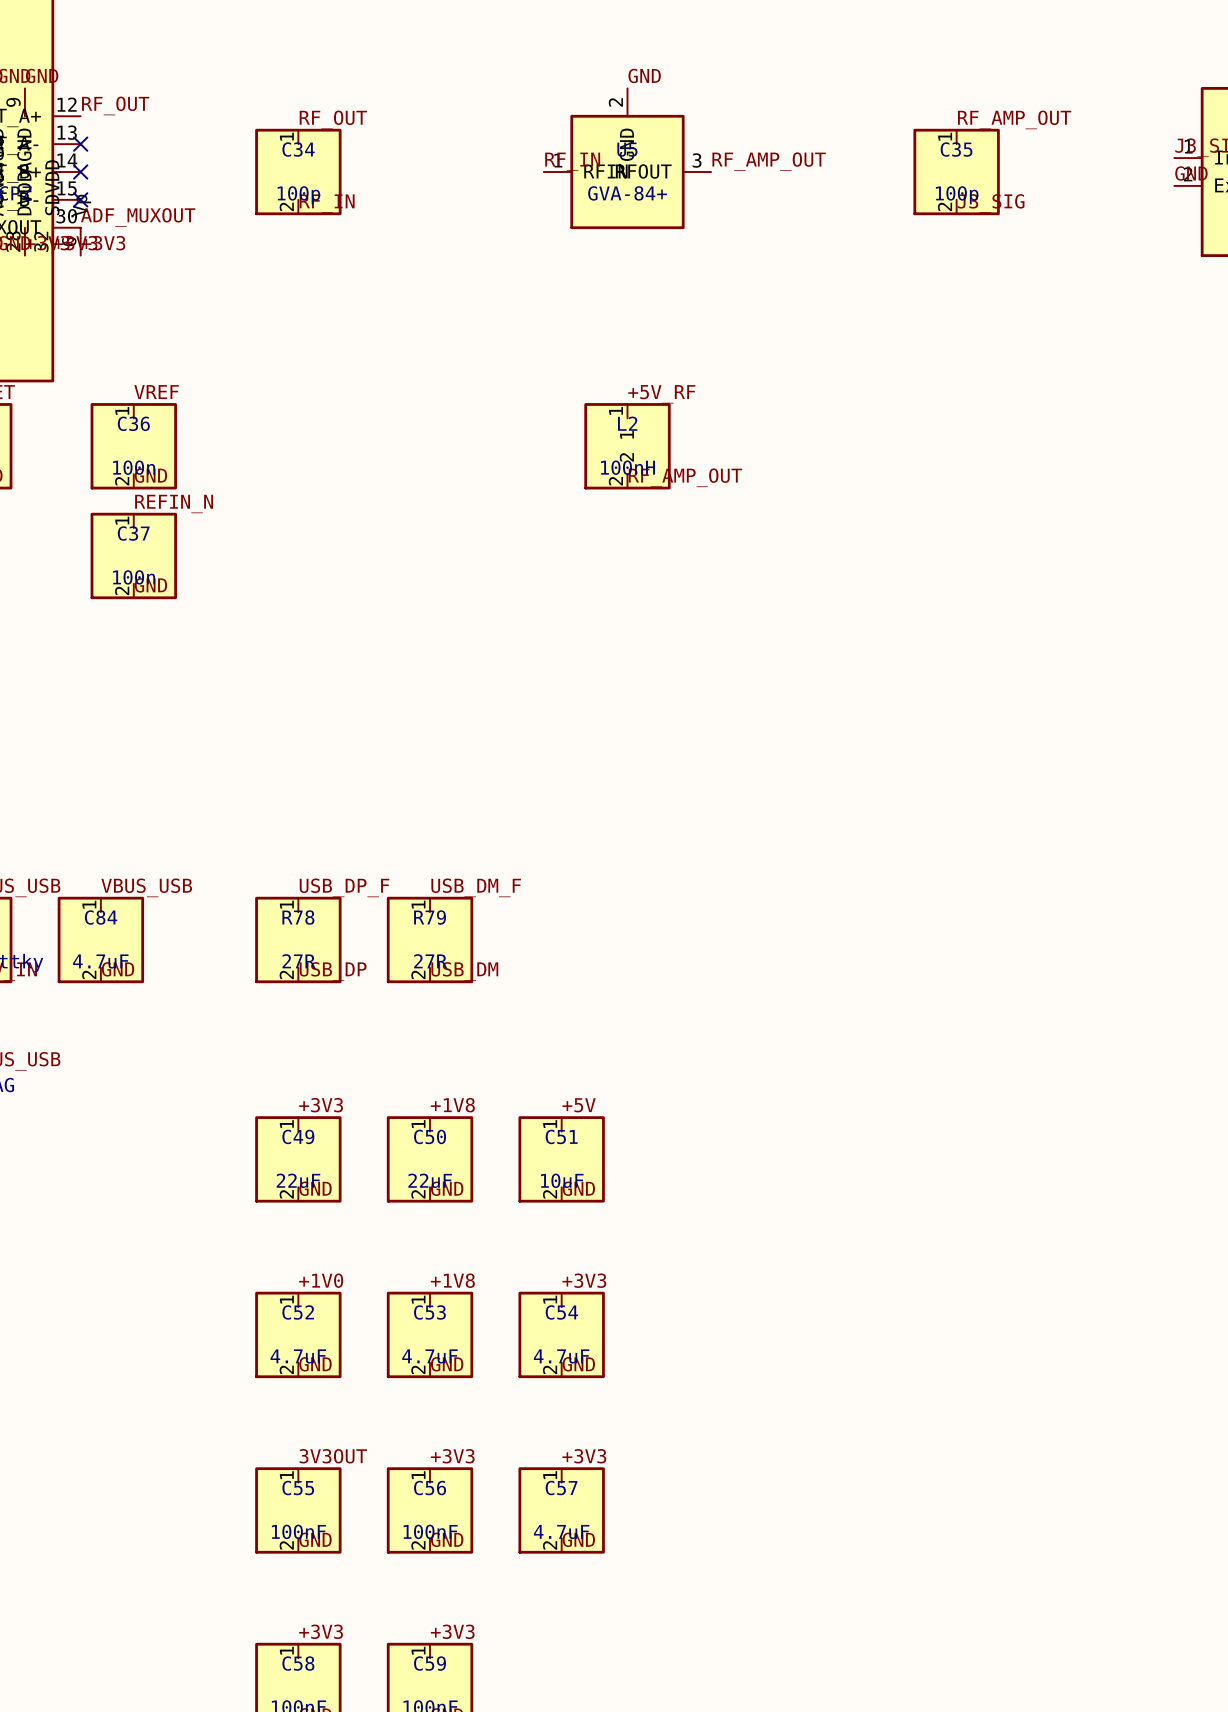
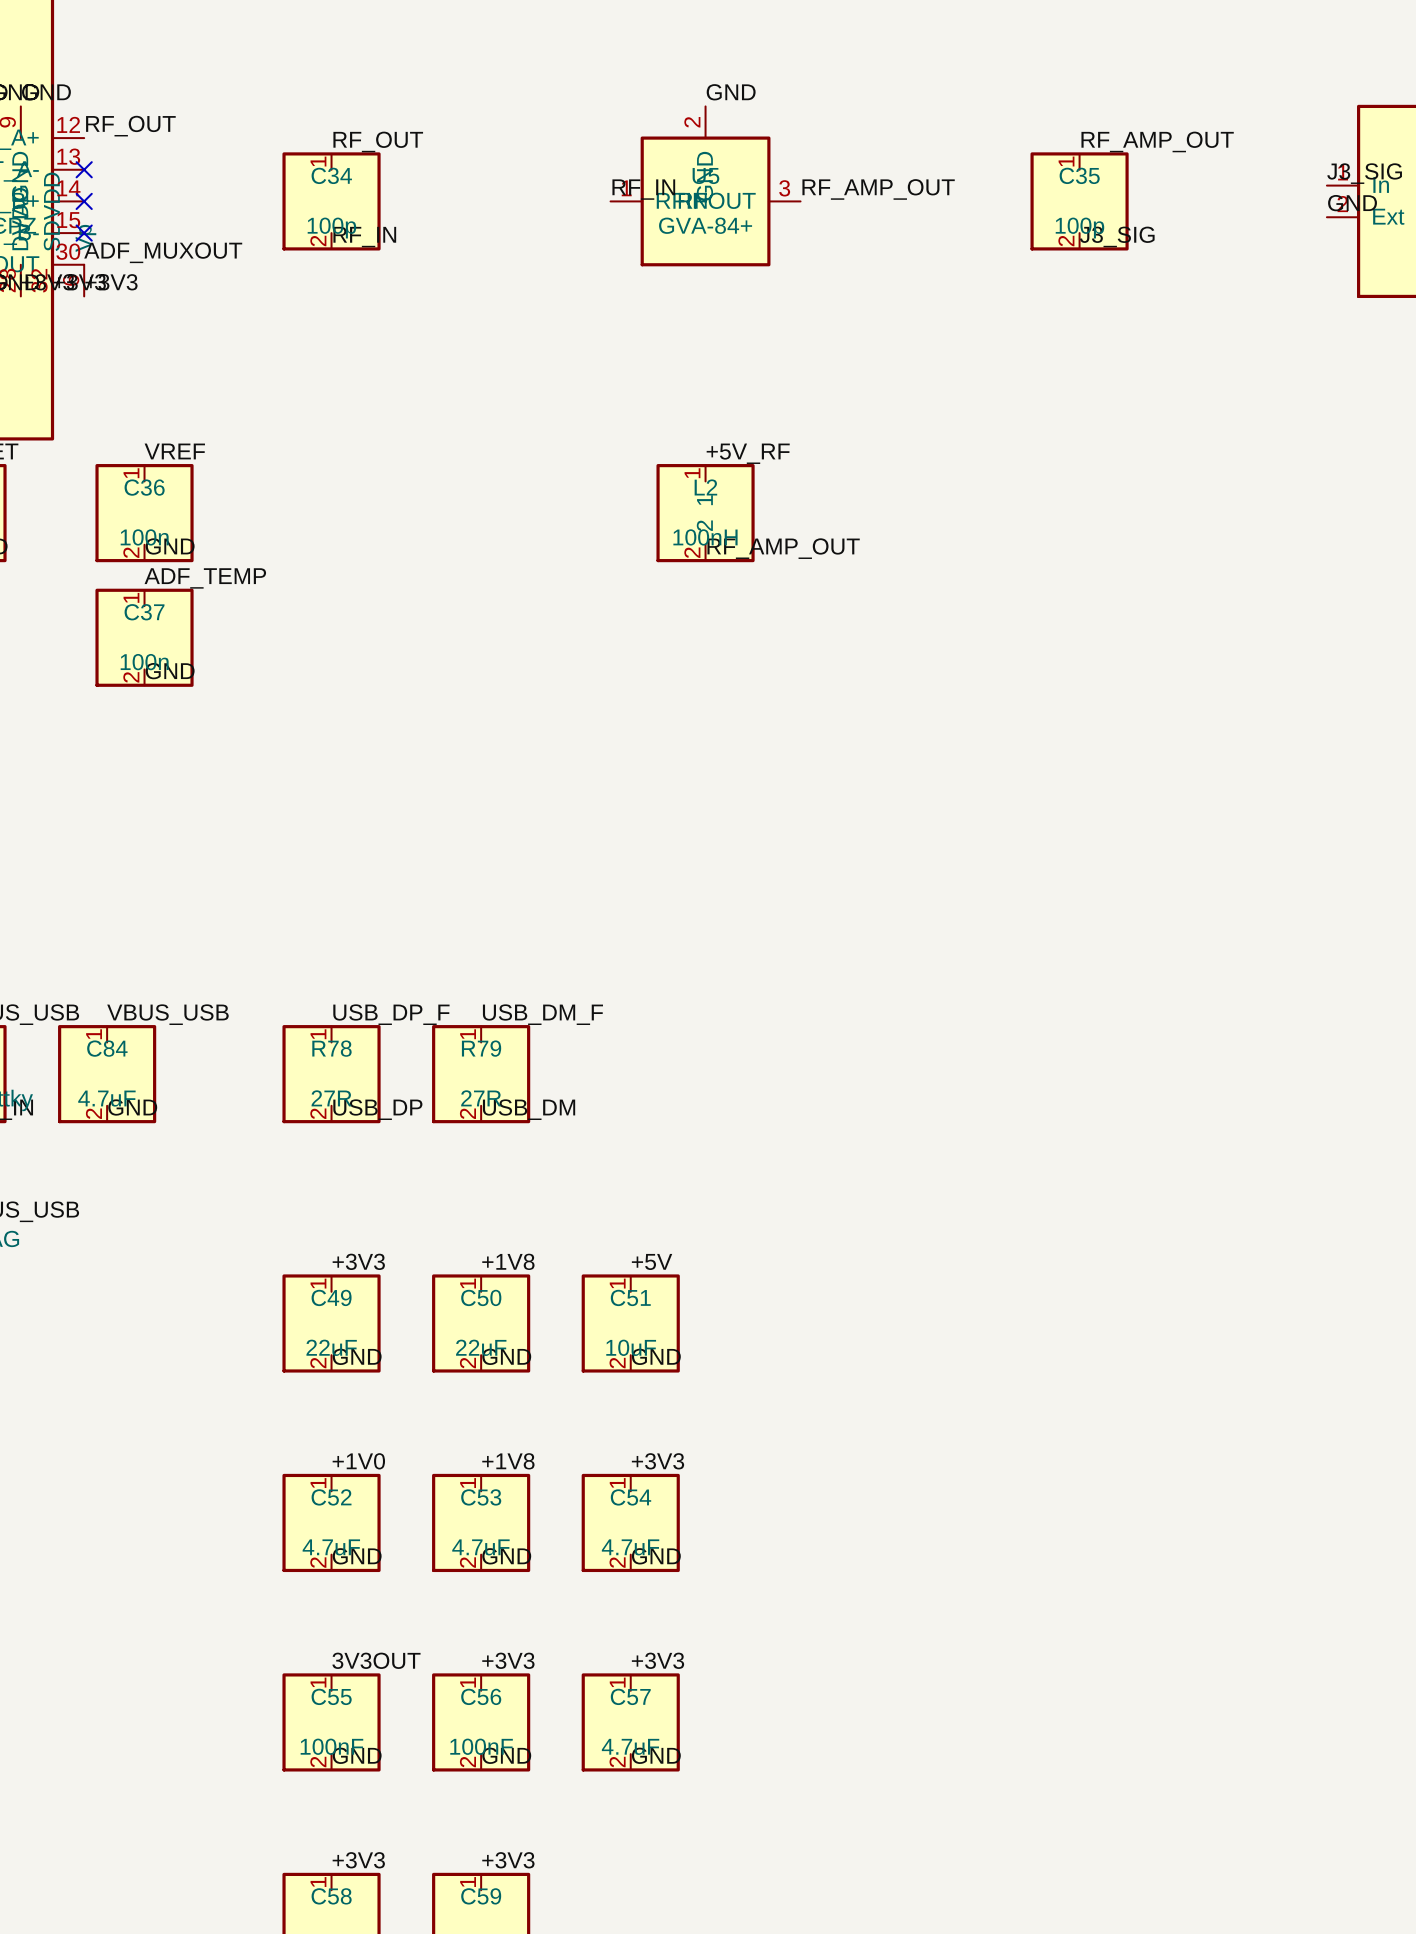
label: REFIN_N (174, 504) -> ADF_TEMP (205, 578)

